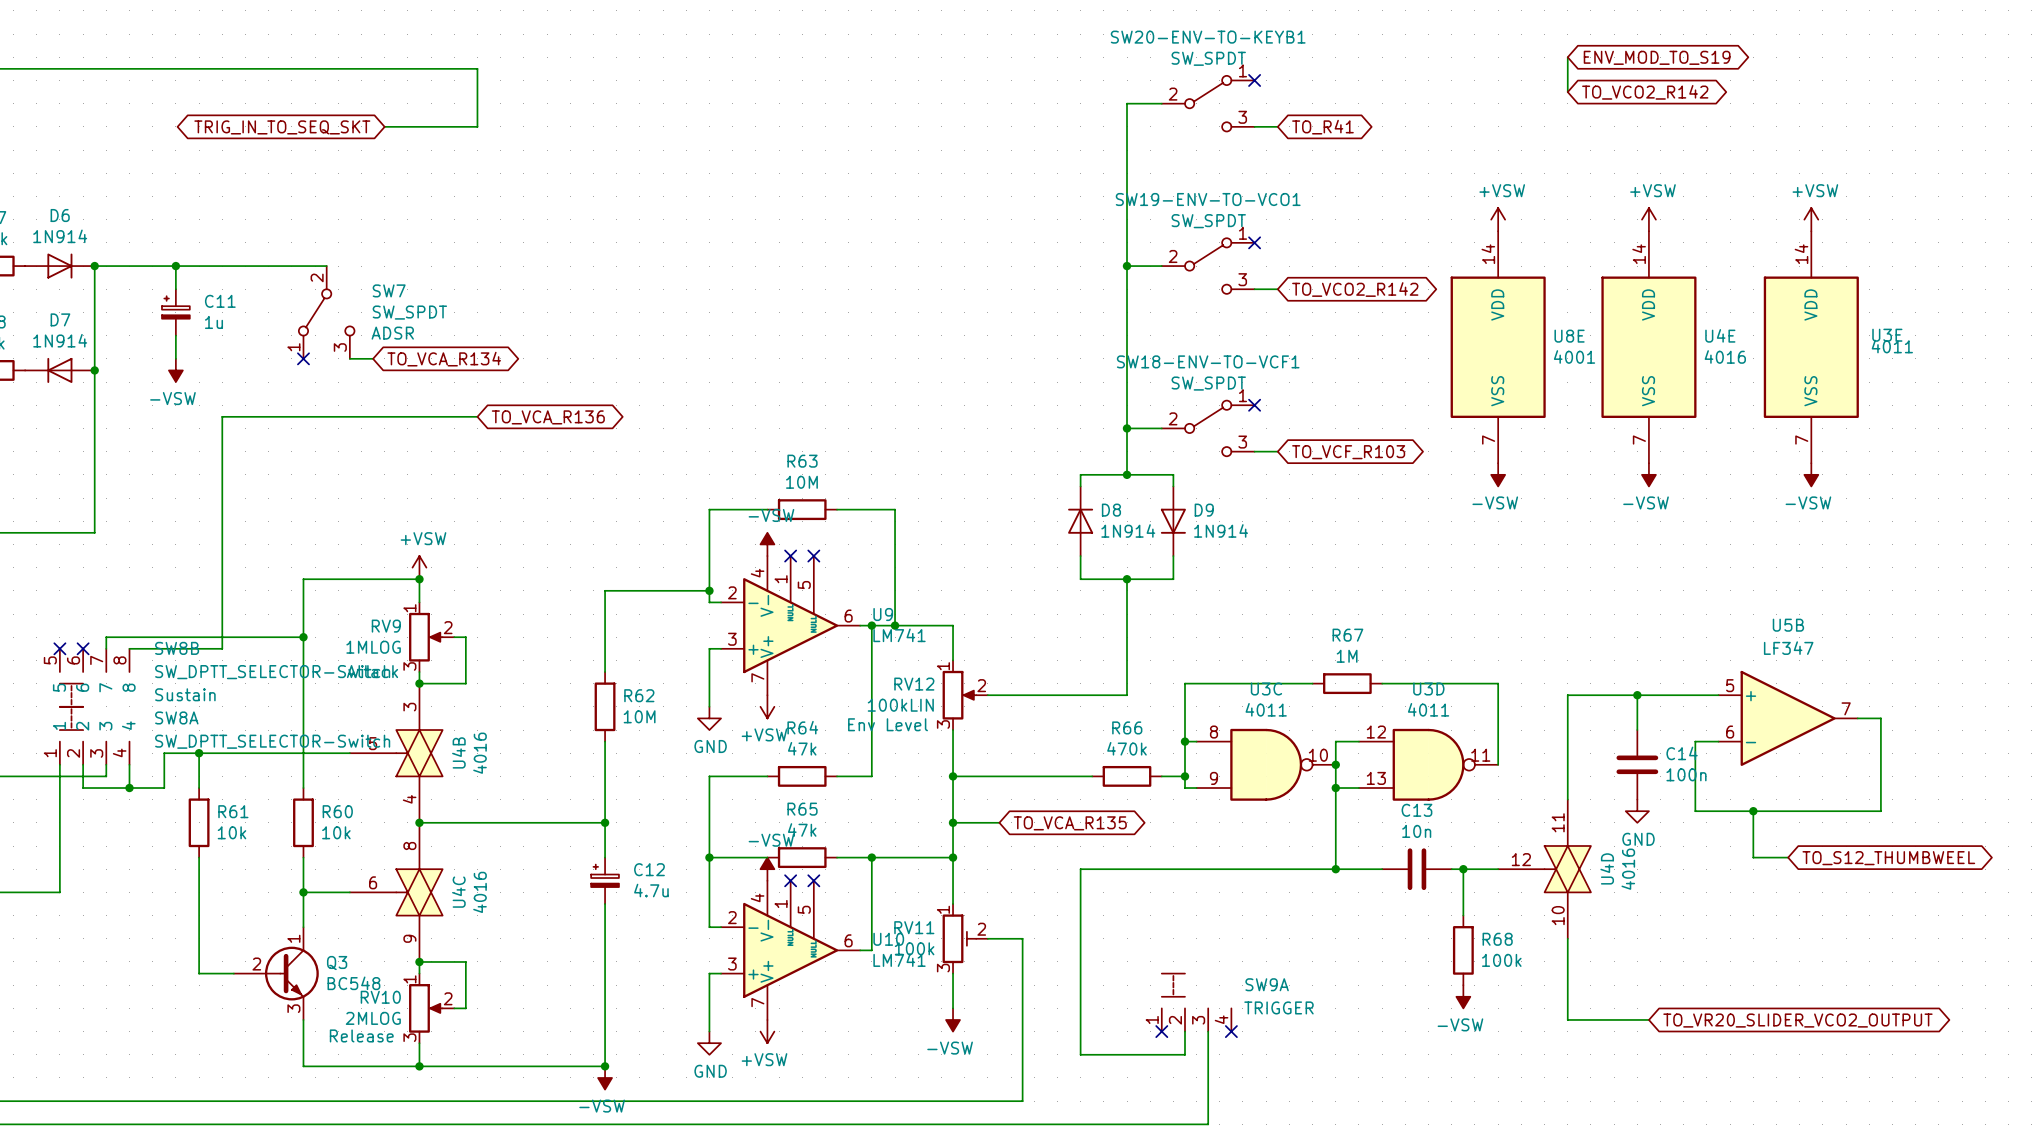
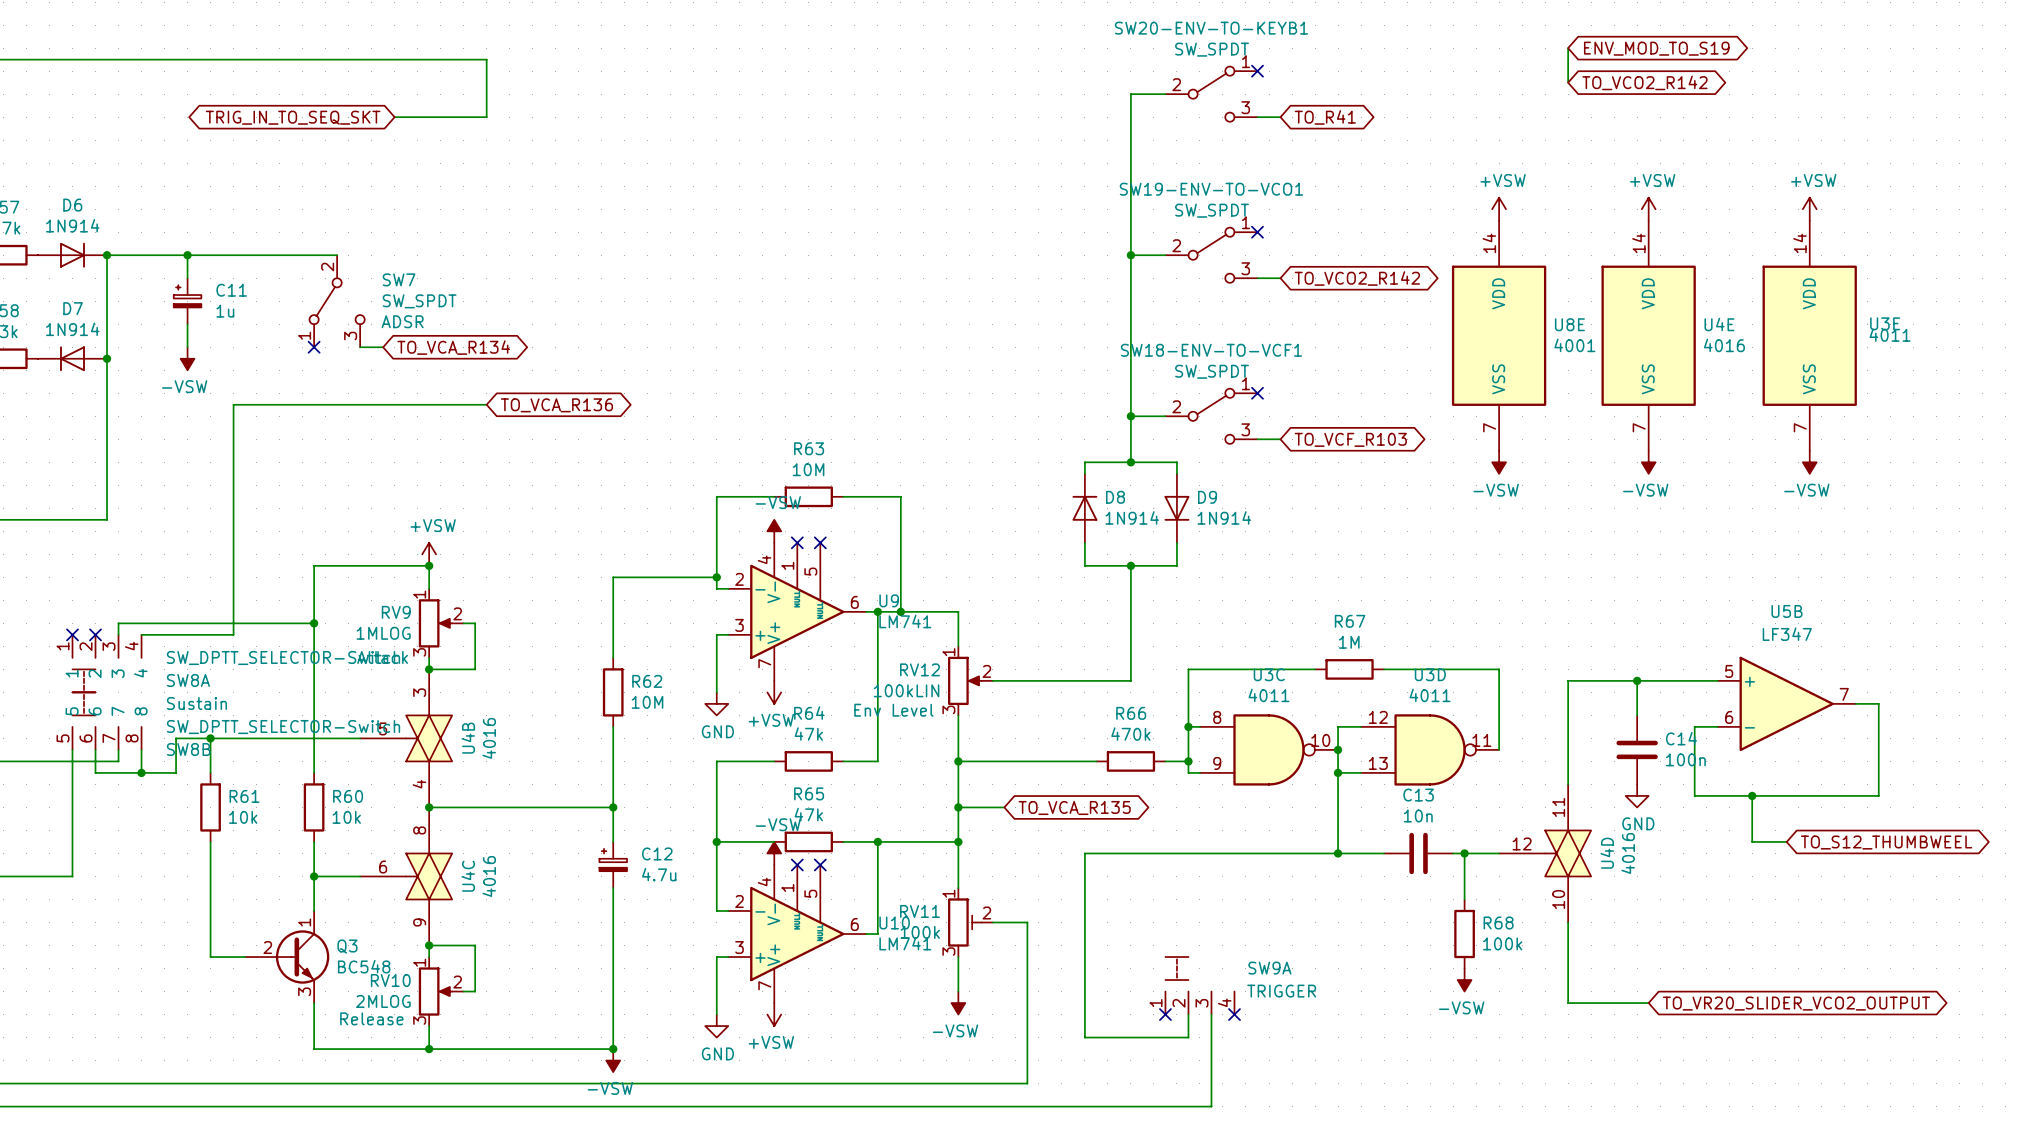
SW8B position: (94, 677) -> (107, 721)
SW8B flip: as is (71, 689) -> up-down (84, 709)
SW8A flip: as is (71, 712) -> up-down (84, 686)
SW8A position: (94, 730) -> (107, 669)

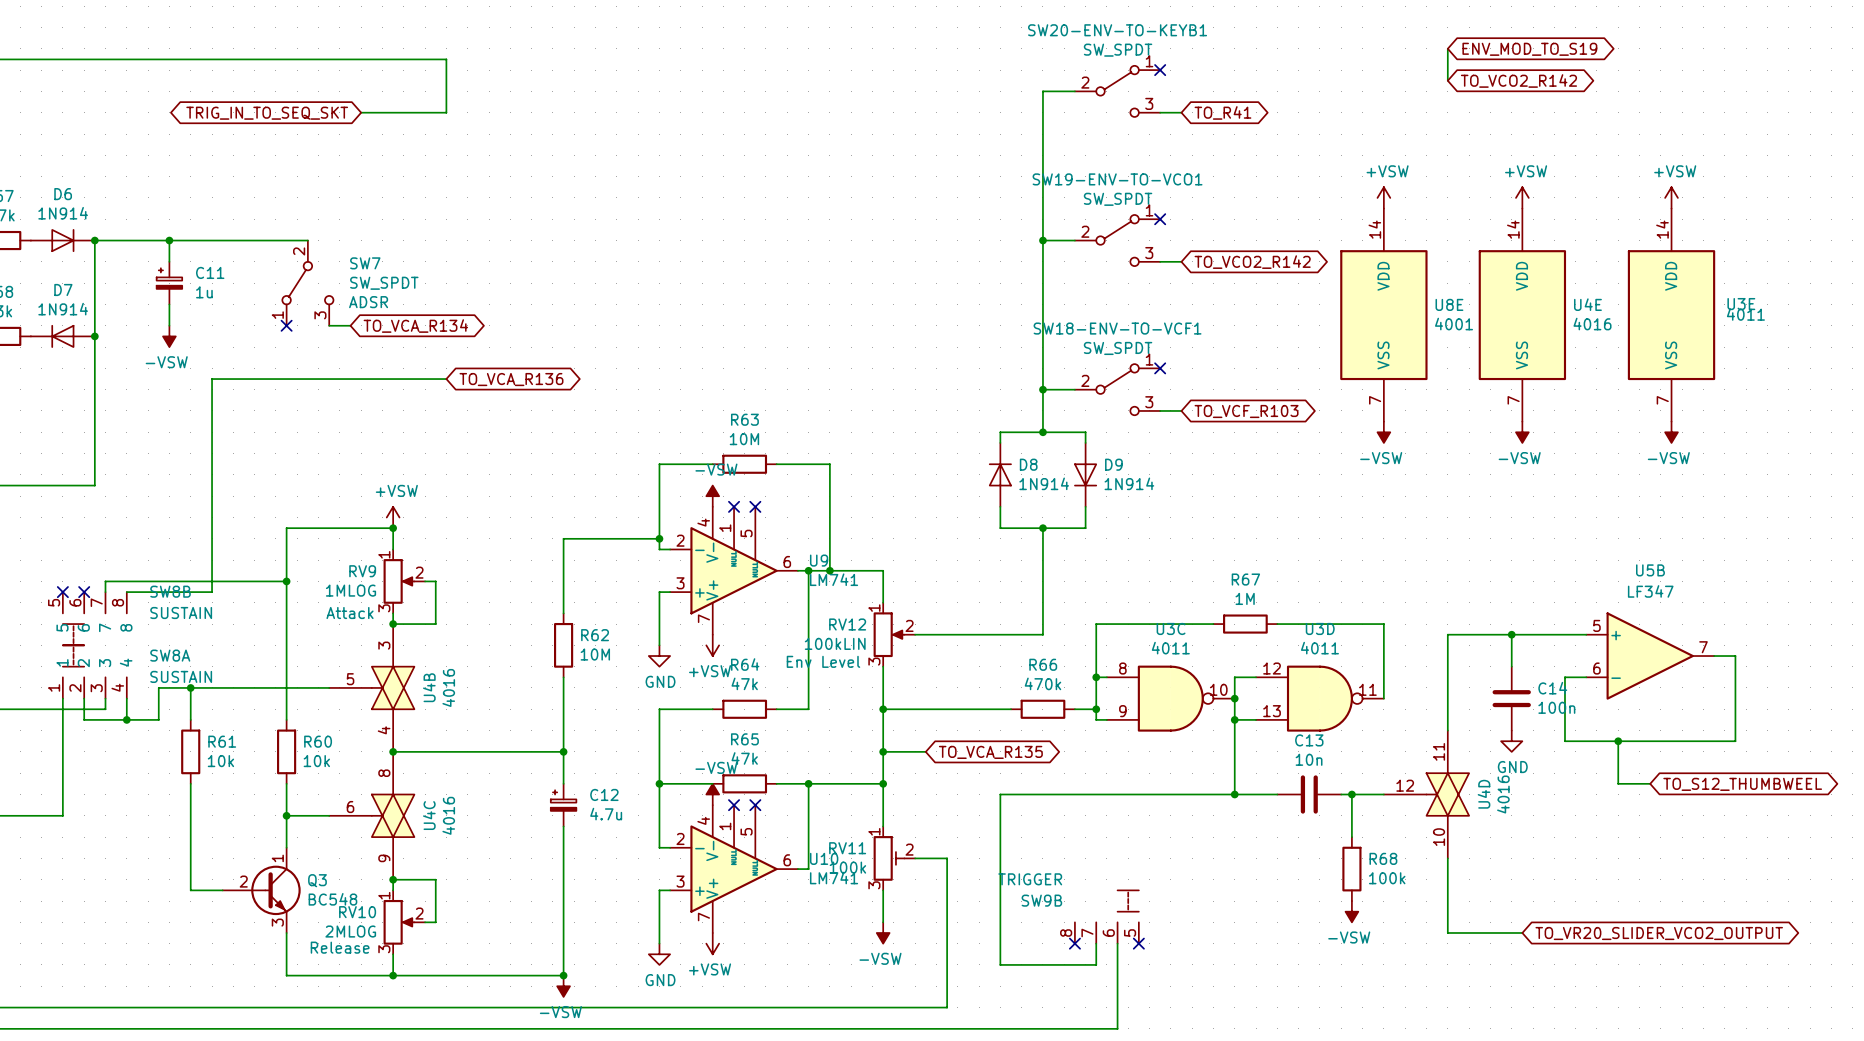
SW8A value: SW_DPTT_SELECTOR-Switch (283, 658) -> SUSTAIN (181, 676)
SW8A position: (107, 669) -> (94, 666)
SW8A flip: as is (84, 686) -> up-down (73, 650)
SW8B text: Sustain (196, 703) -> none
SW8B flip: as is (84, 709) -> up-down (73, 629)
SW8B position: (107, 721) -> (94, 618)
SW8B value: SW_DPTT_SELECTOR-Switch (283, 727) -> SUSTAIN (181, 613)
SW9A: TRIGGER (1199, 980) -> none
SW9B: none -> TRIGGER (1106, 917)

